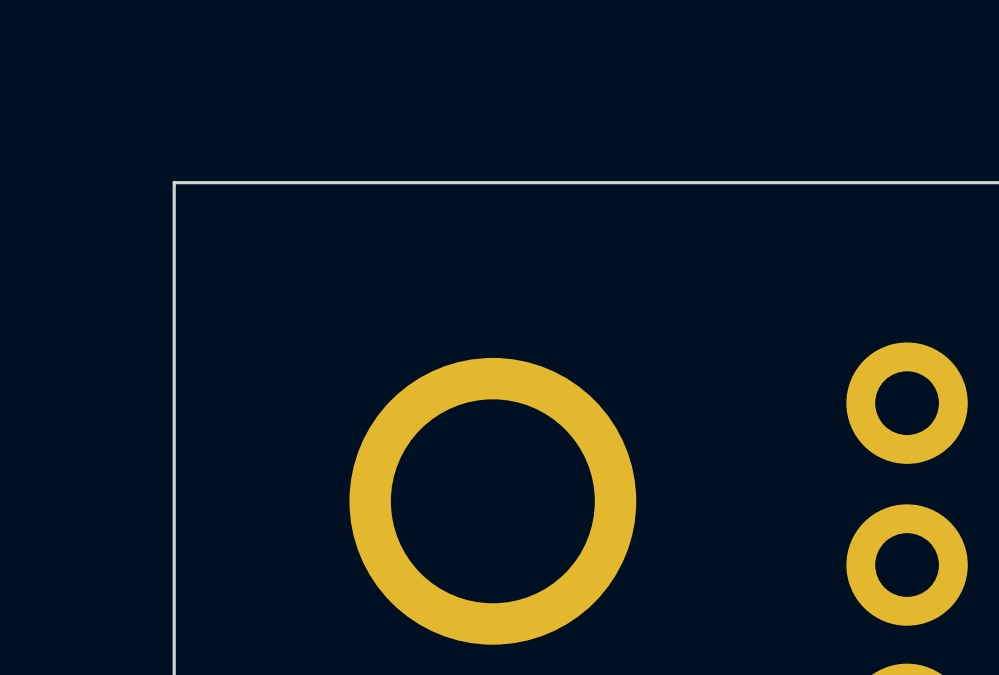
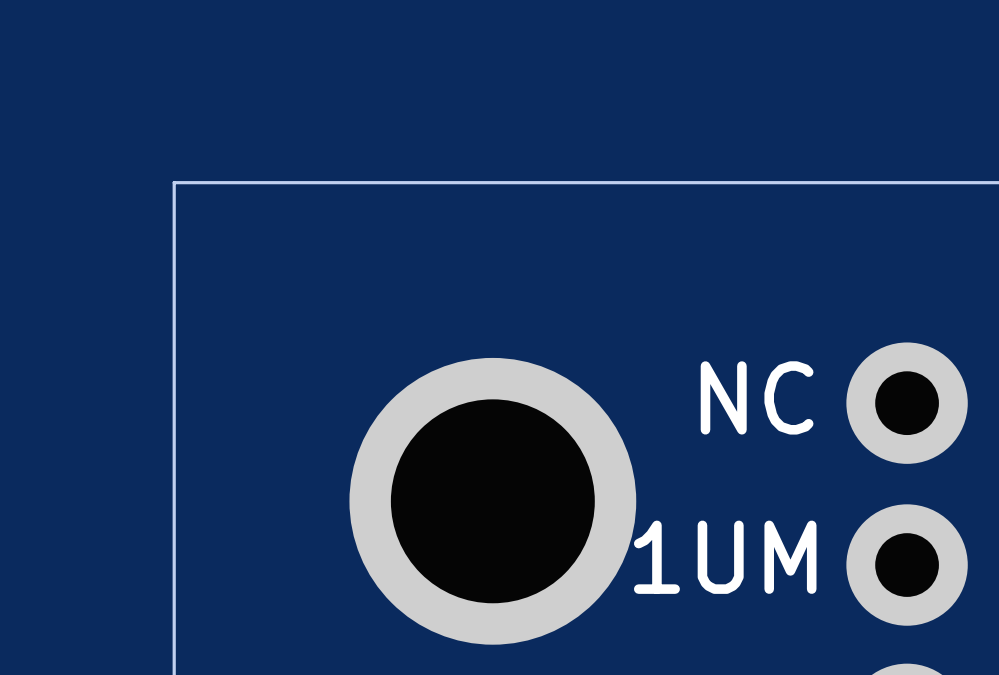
part text: none -> NC (757, 397)
part text: none -> 1UM (725, 557)

